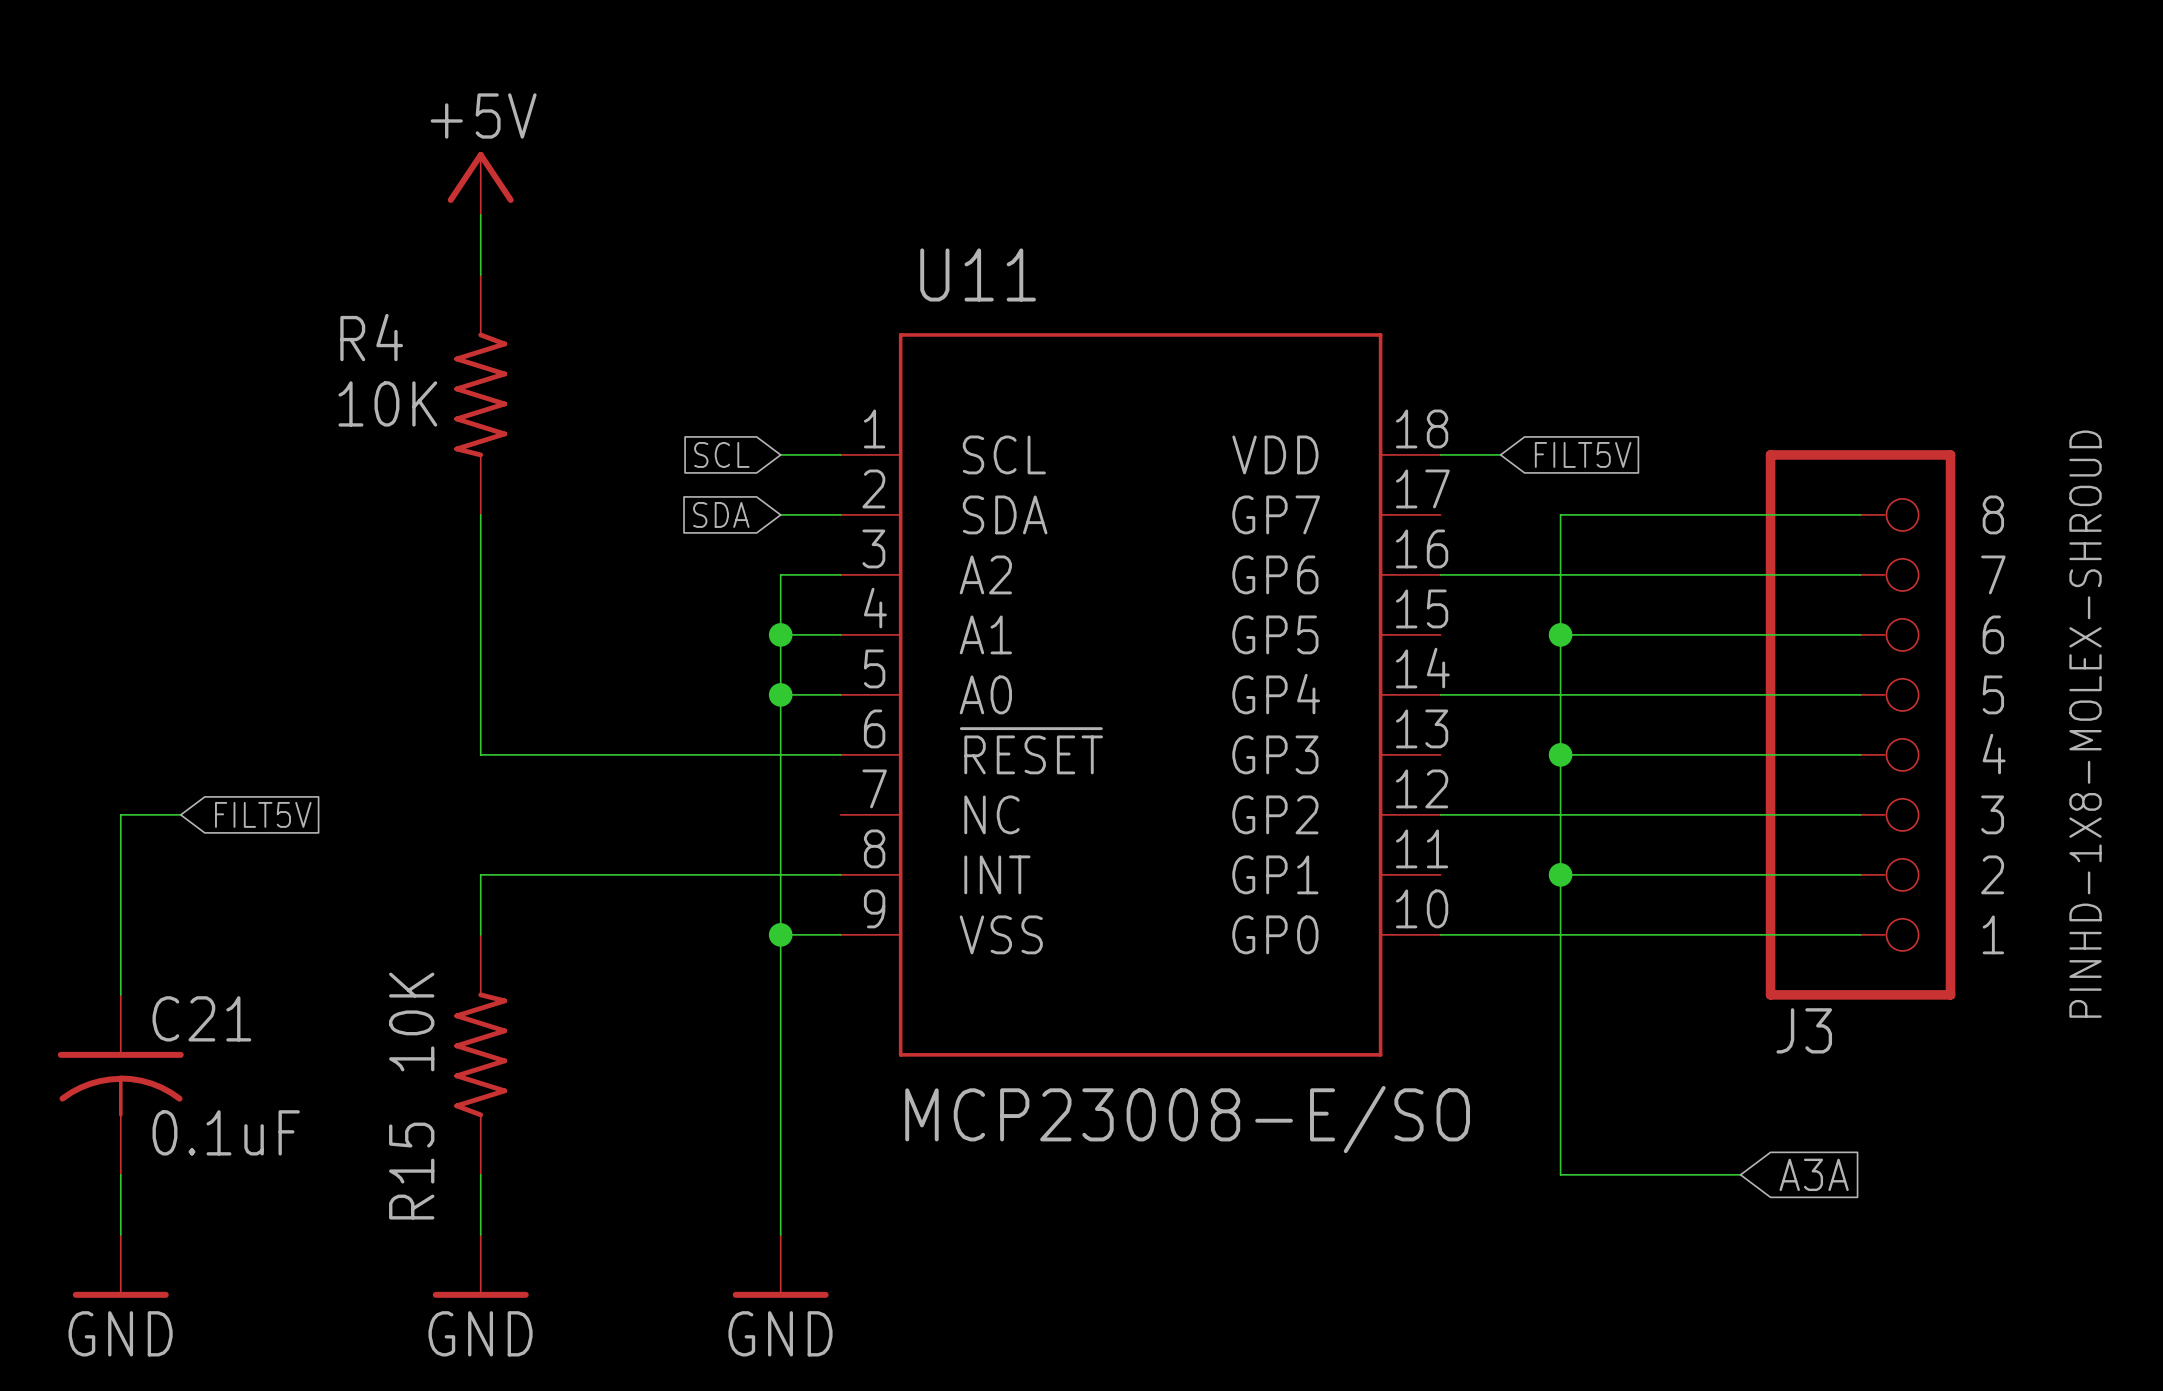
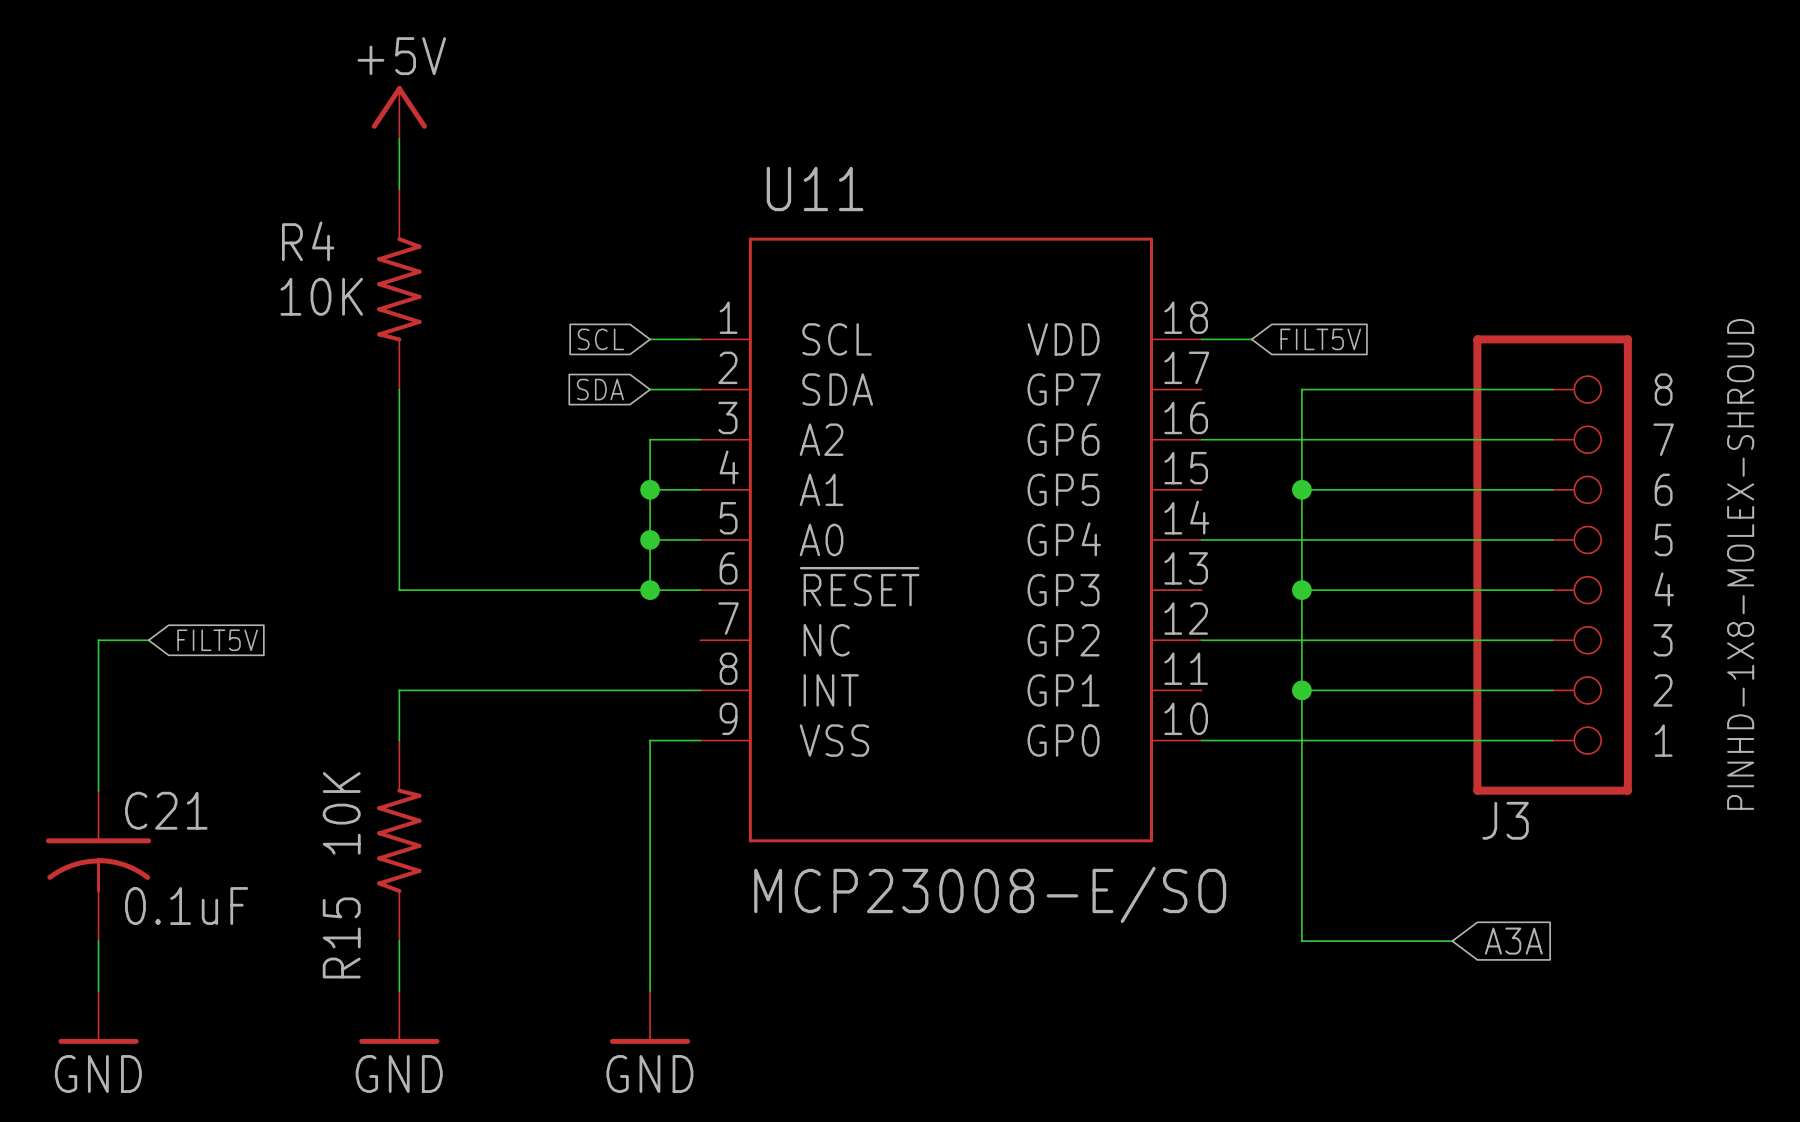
wire: (780, 754) (780, 934) -> none
junction: none -> (650, 590)
junction: (780, 934) -> none

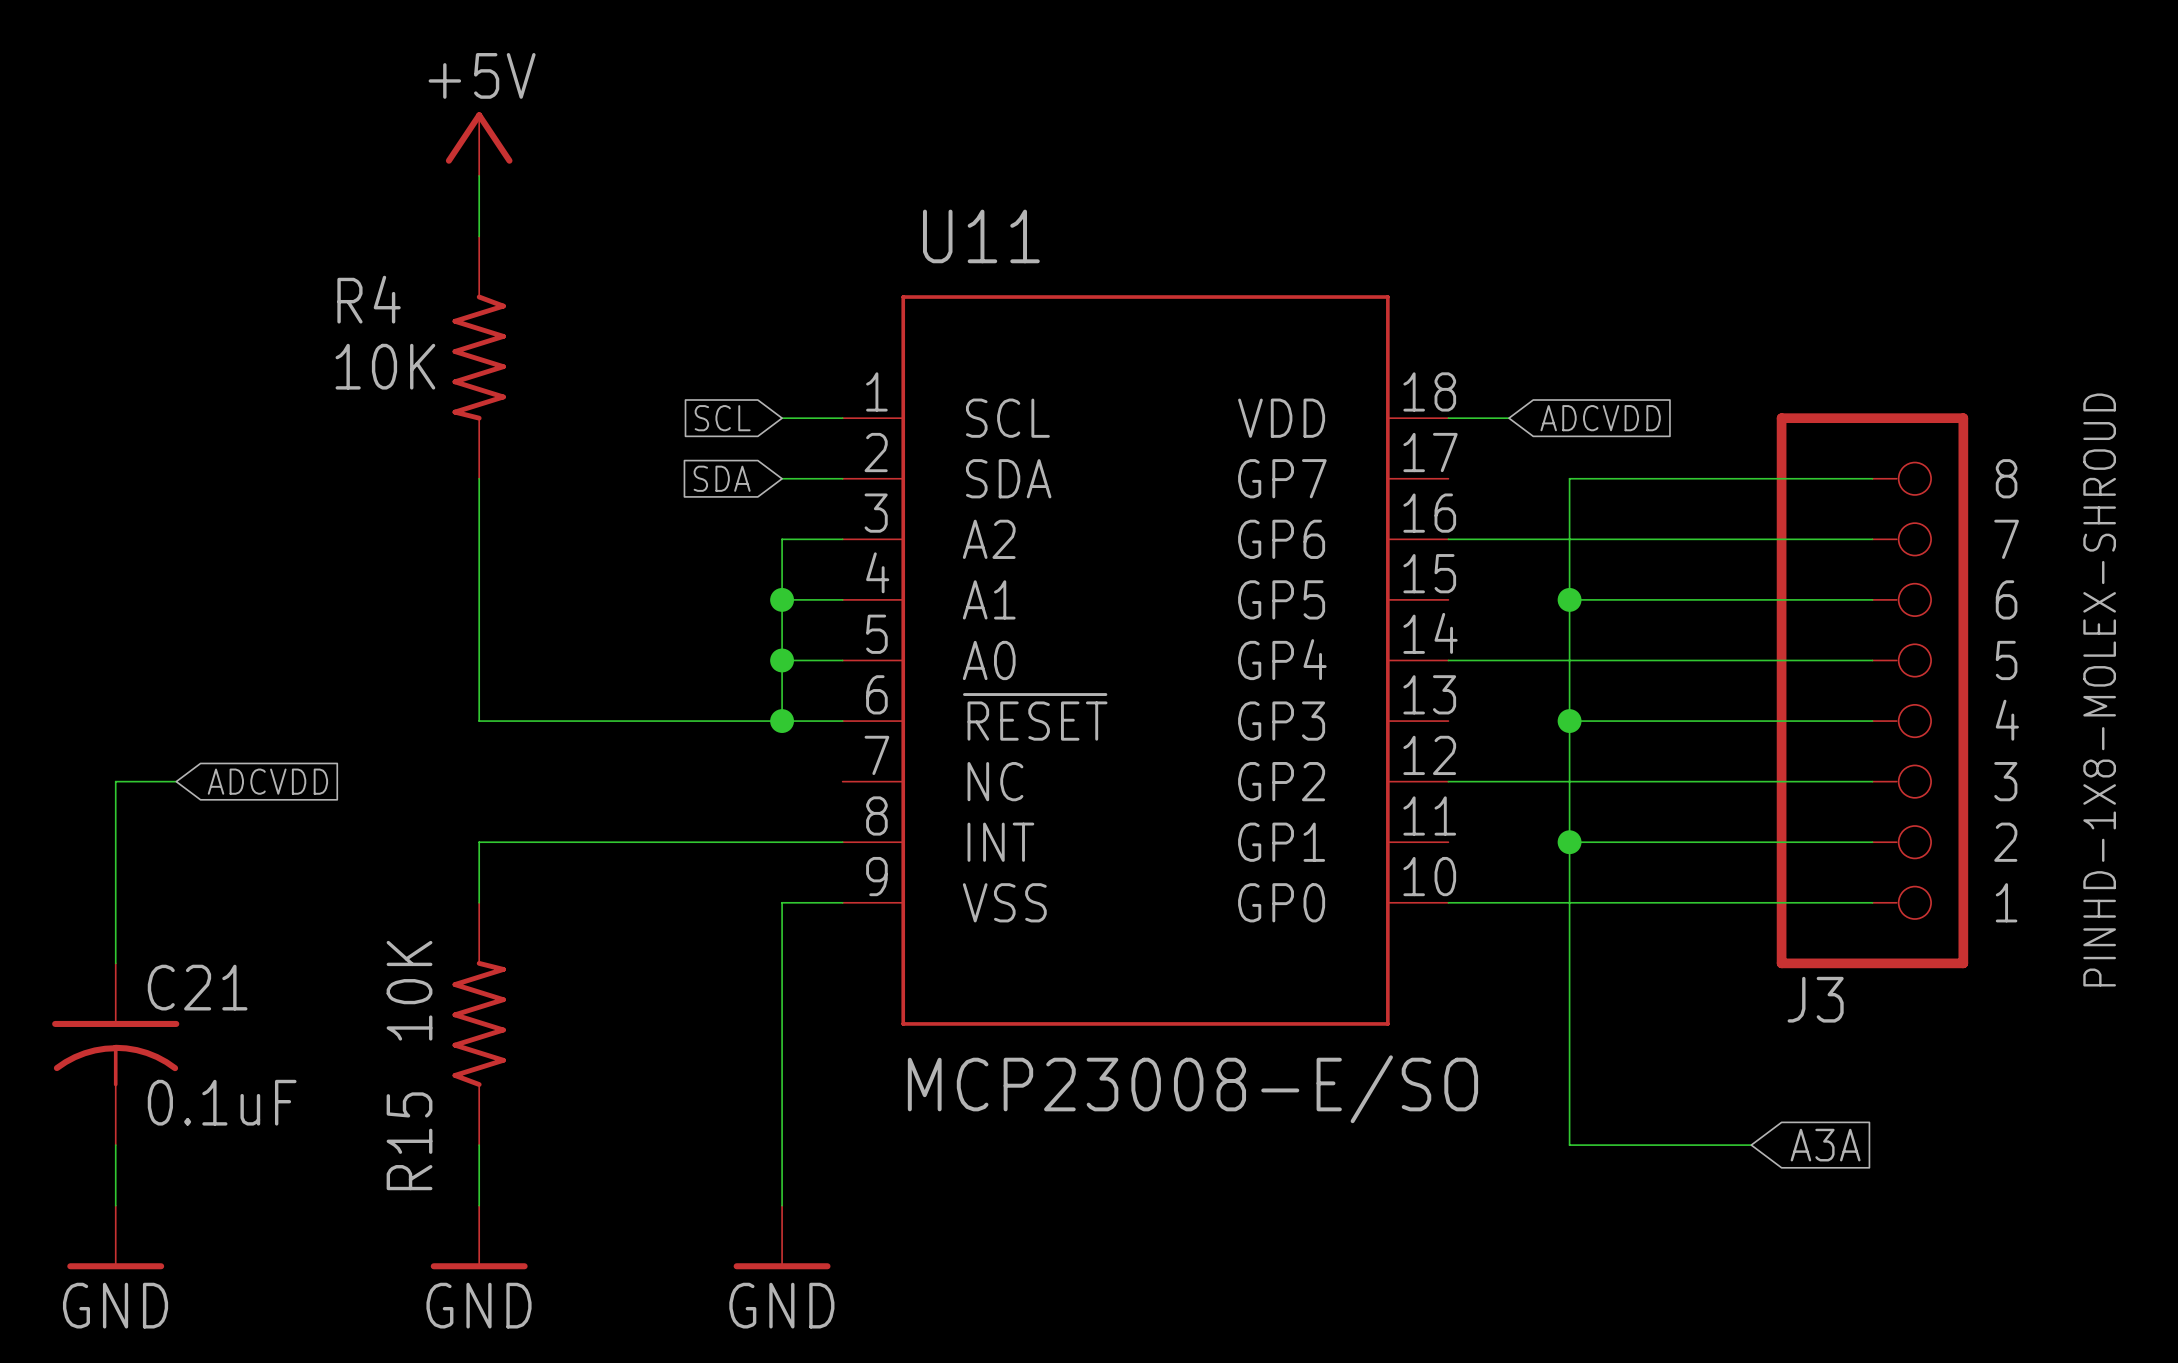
global label: FILT5V (1320, 339) -> ADCVDD (1600, 418)
global label: FILT5V (217, 640) -> ADCVDD (267, 781)

